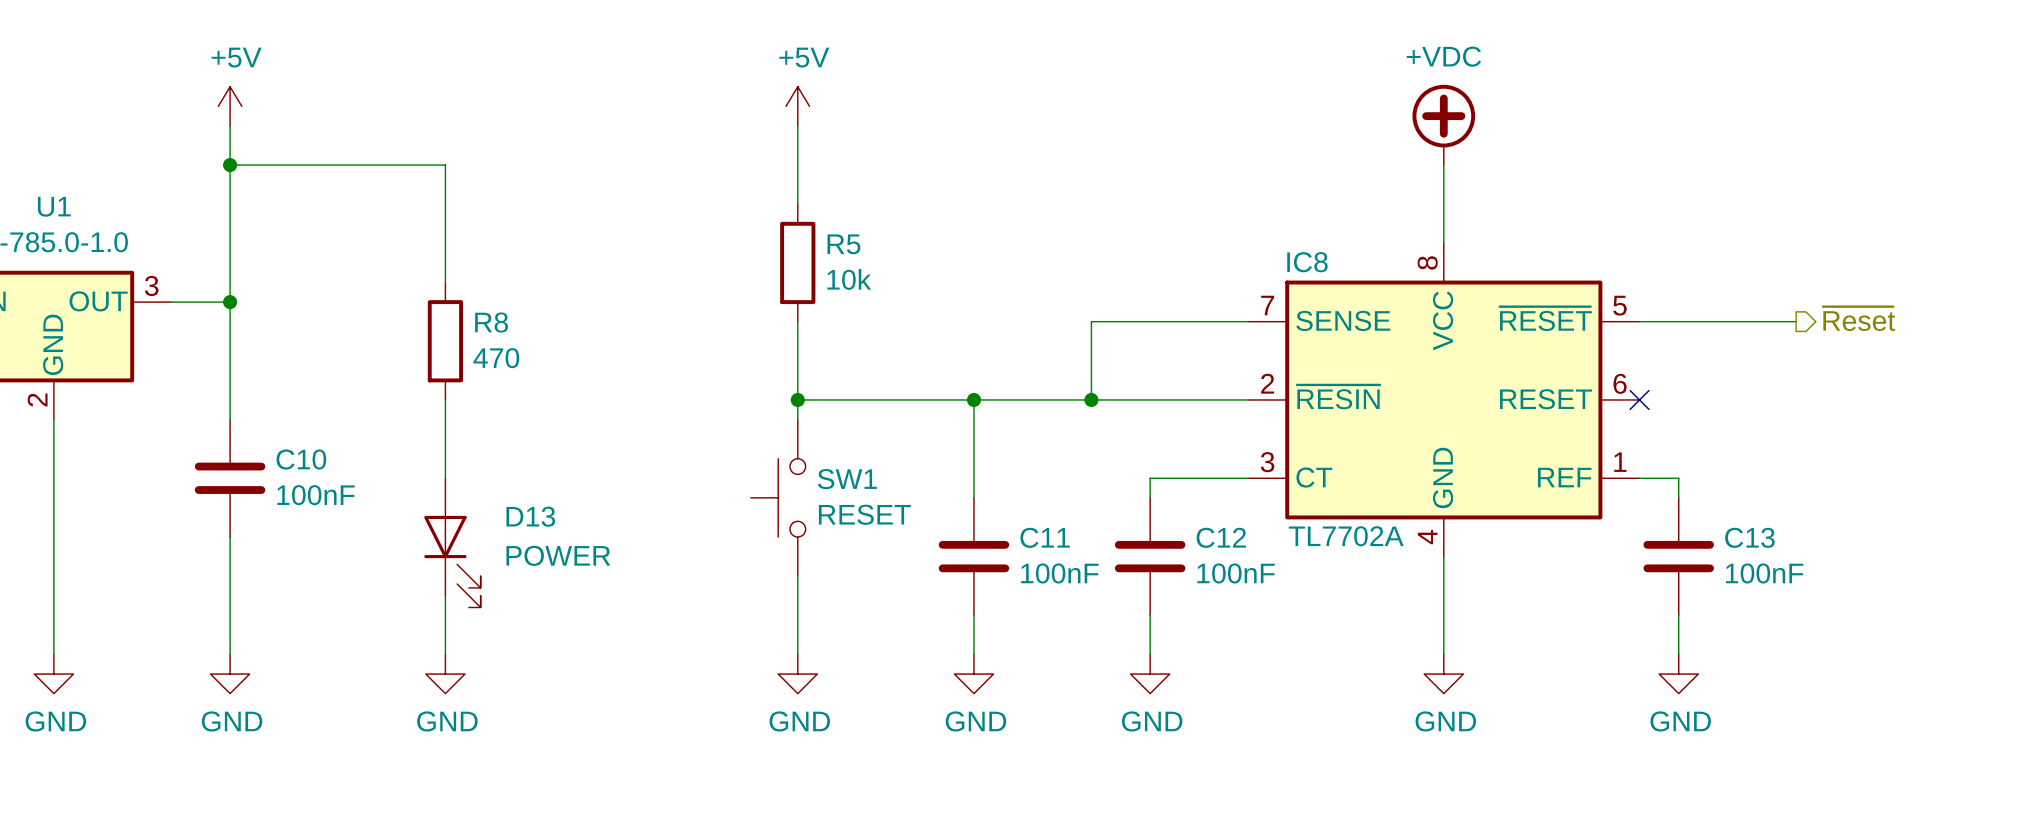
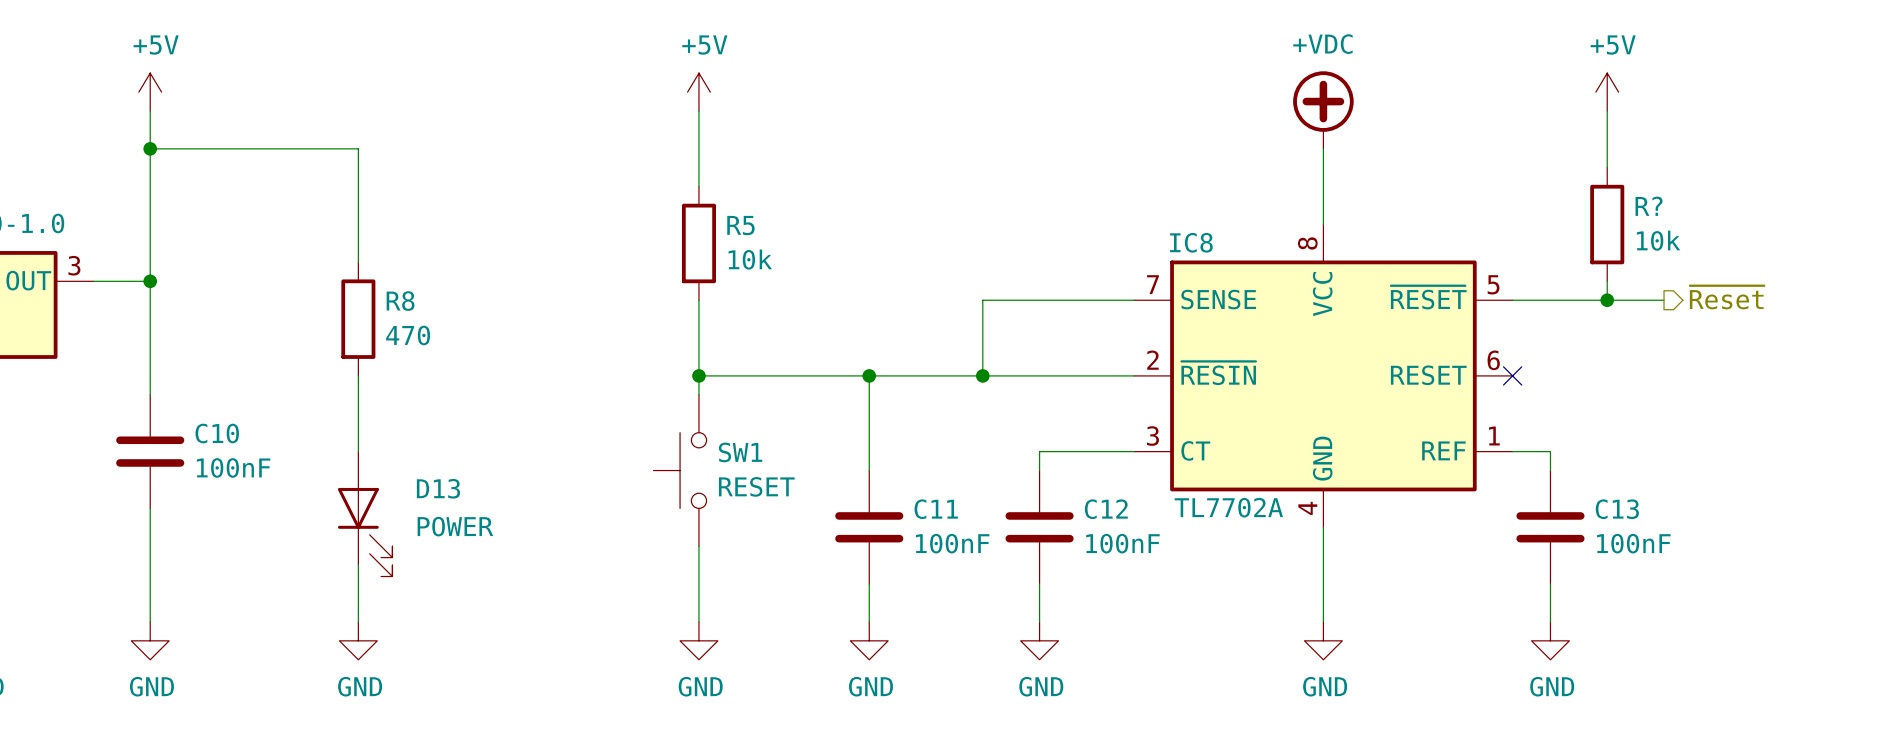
power symbol: none -> +5V (1607, 92)
wire: none -> (1607, 111) (1607, 167)
R?: none -> 10k (1607, 224)
wire: none -> (1607, 281) (1607, 300)
junction: none -> (1607, 300)

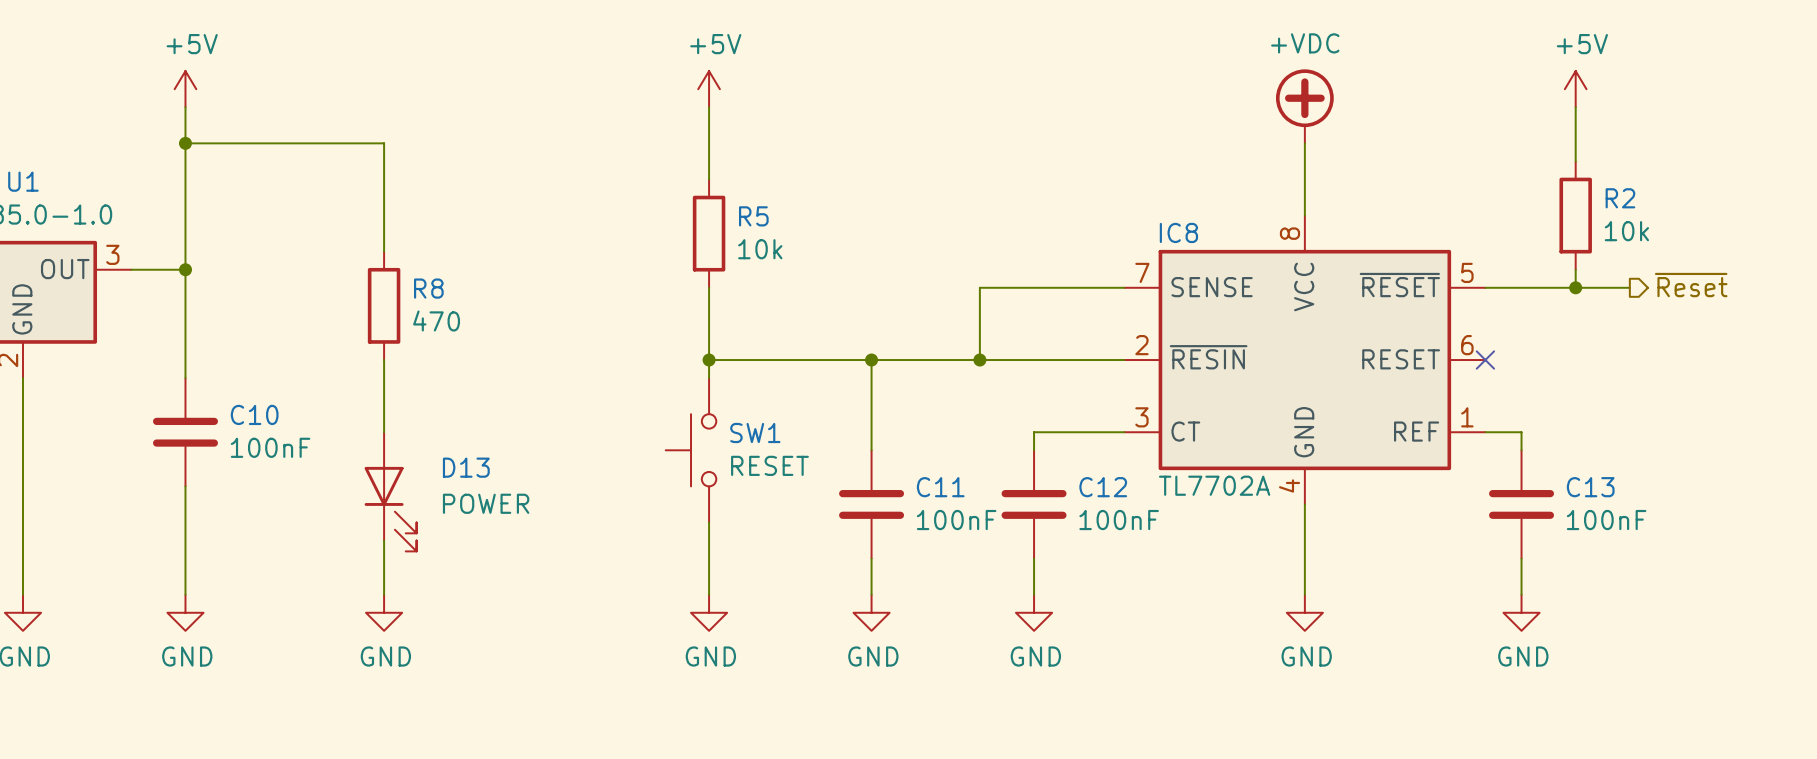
R? name: R? (1649, 206) -> R2 (1620, 198)

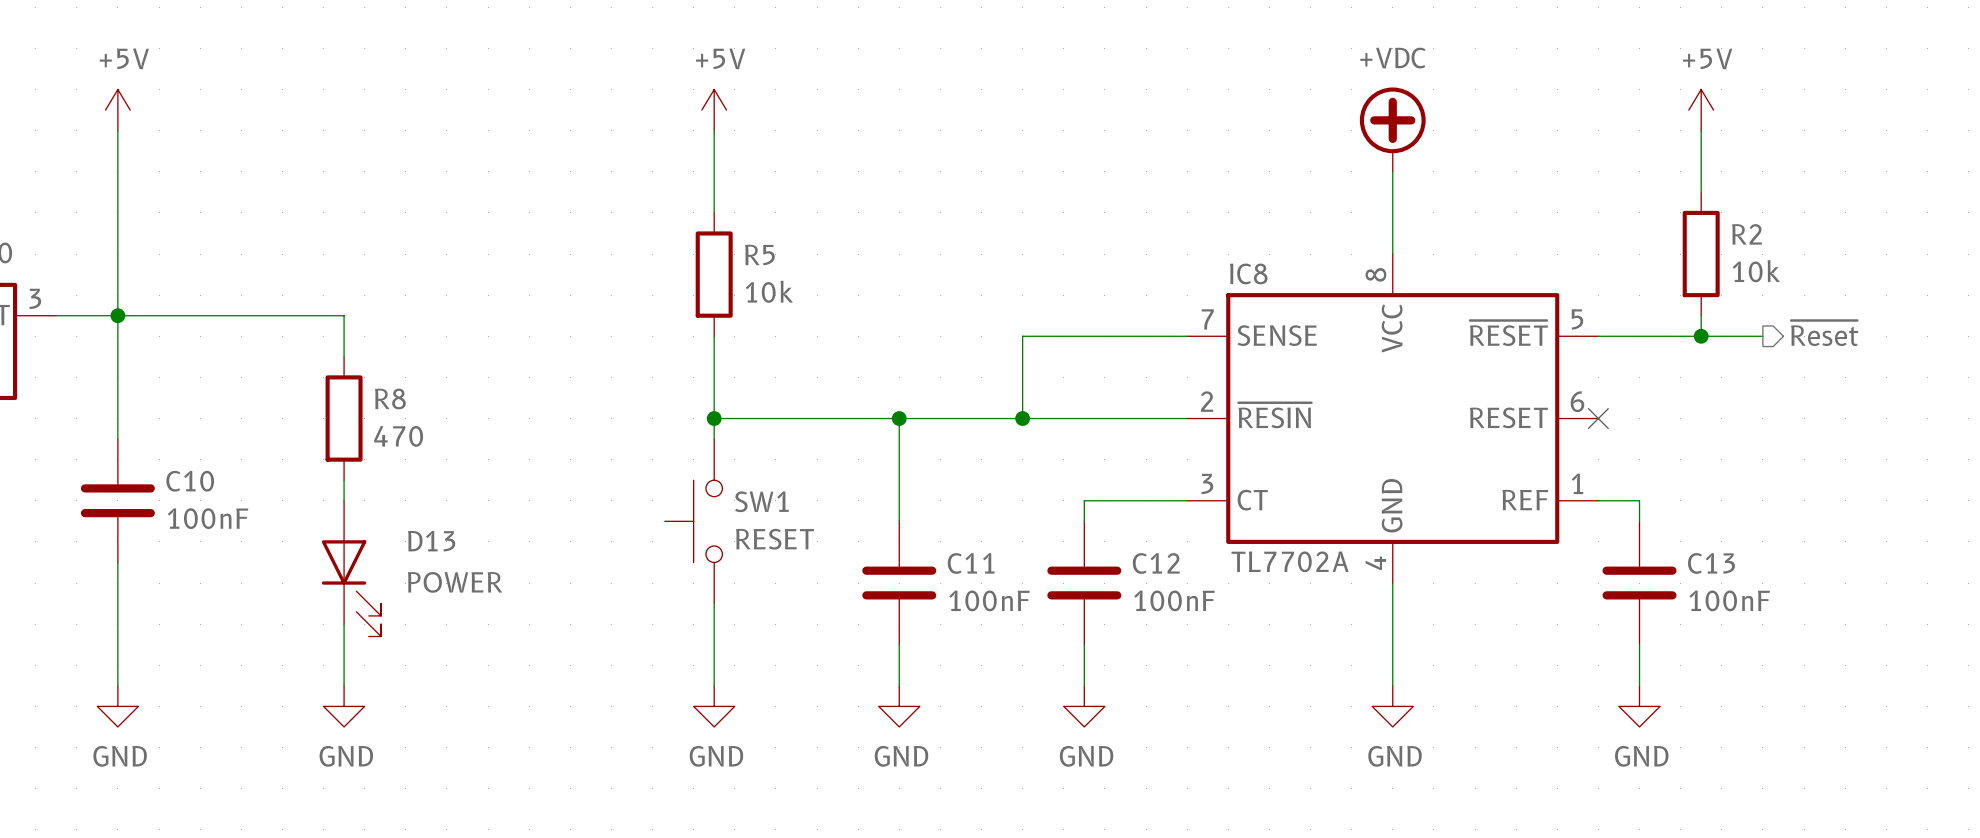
wire: (185, 143) (384, 143) (384, 251) -> none
junction: (185, 143) -> none
wire: none -> (117, 315) (344, 315) (344, 356)
R8 position: (384, 305) -> (344, 418)
wire: (384, 360) (384, 414) -> none

